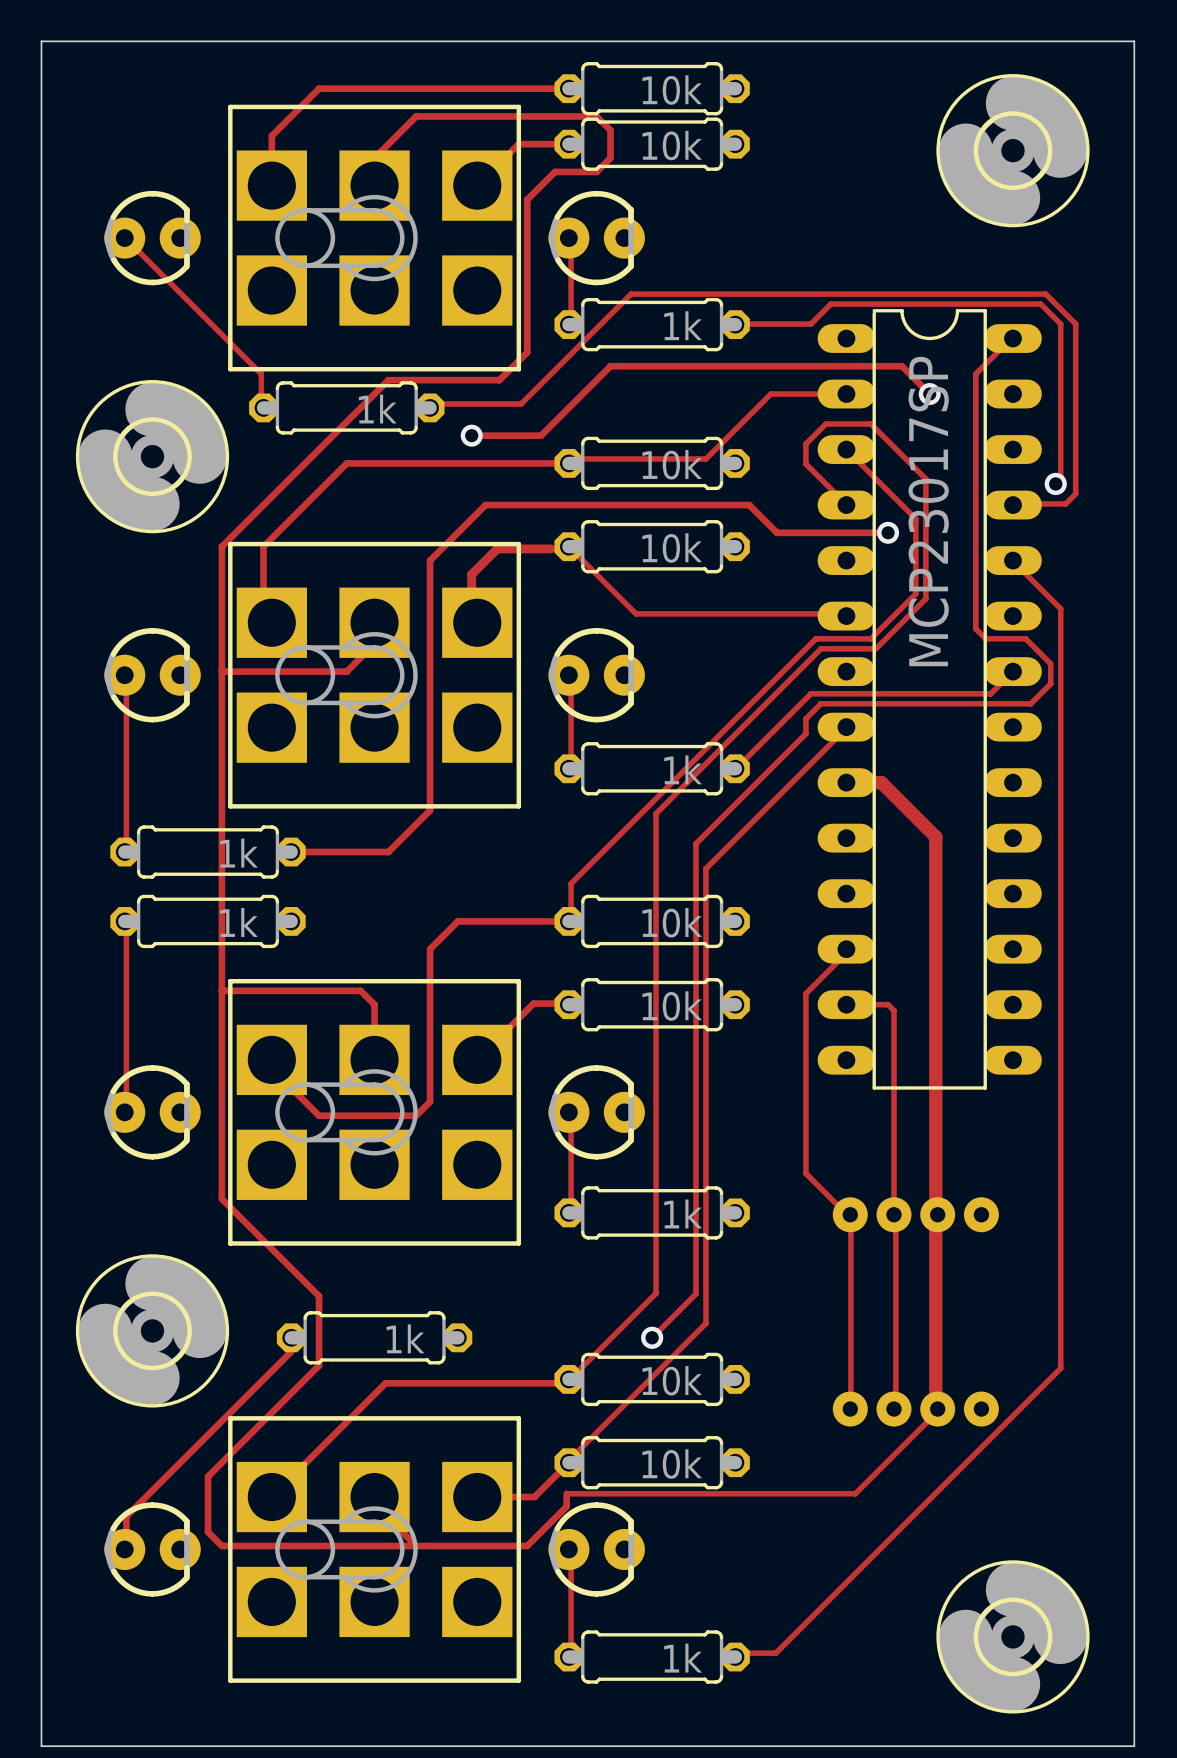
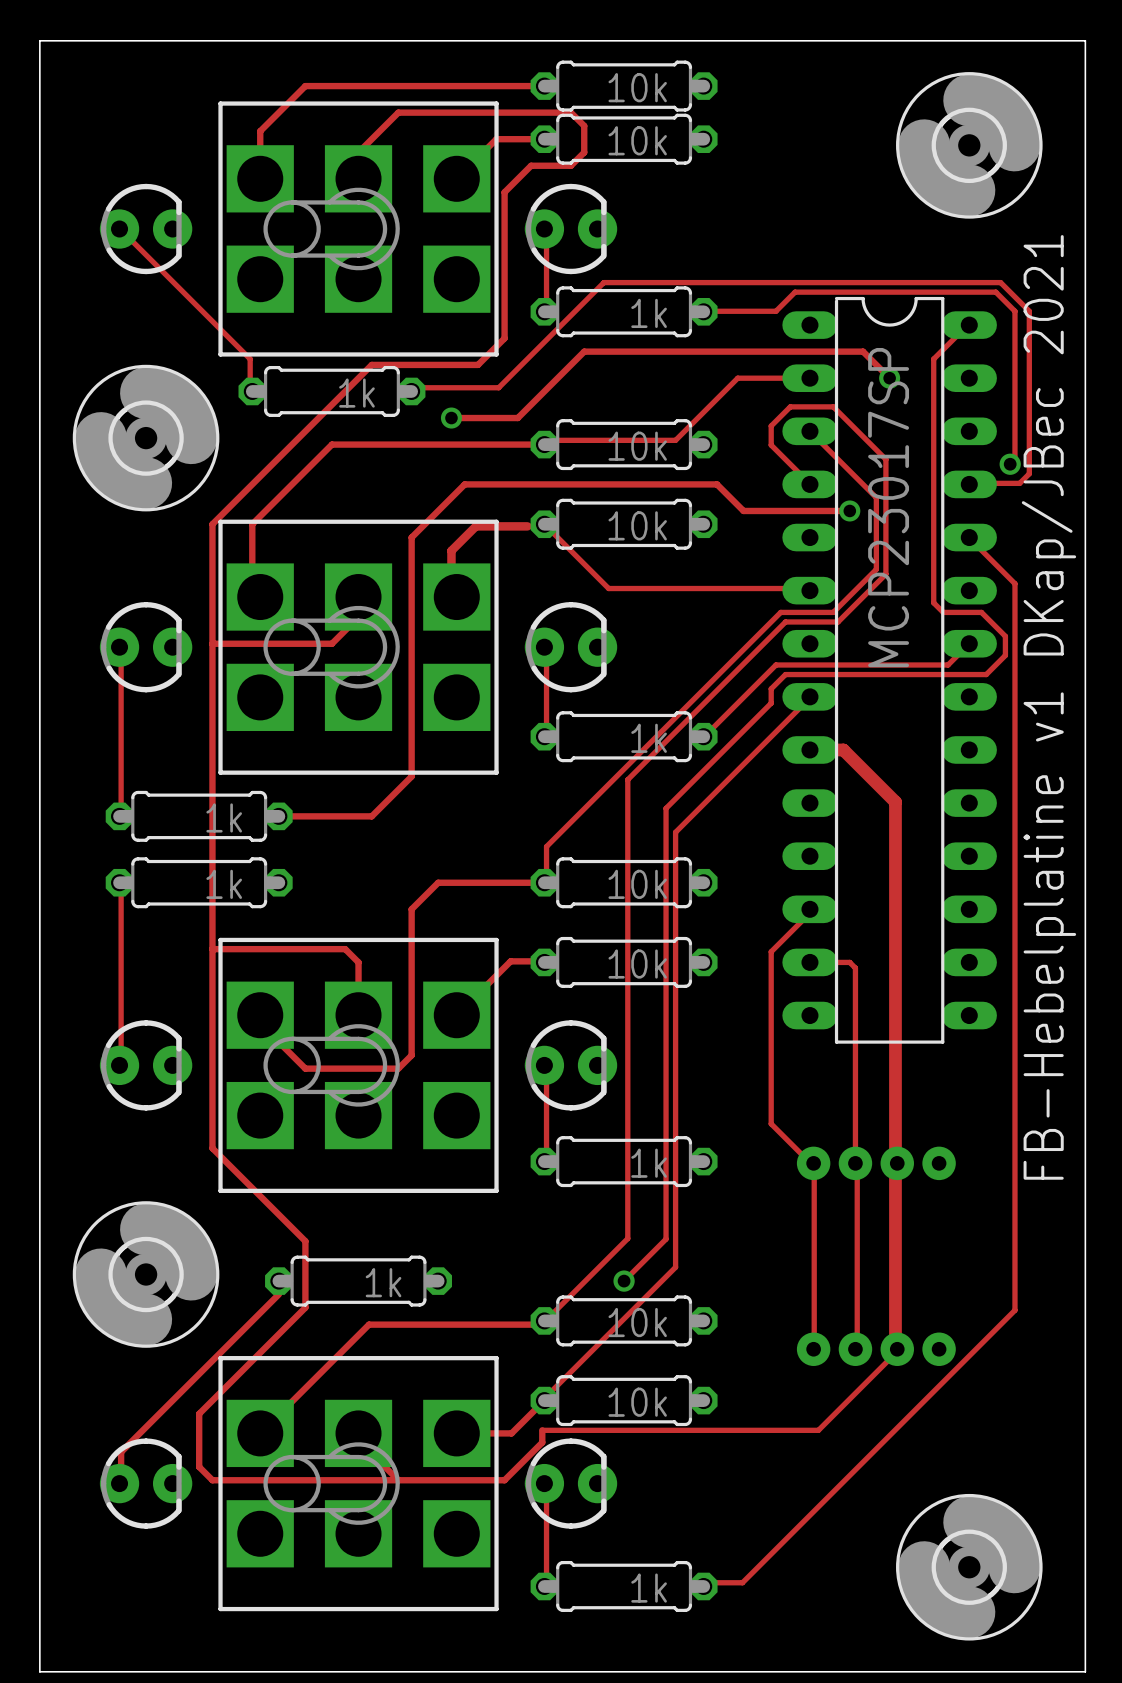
text: none -> FB-Hebelplatine v1 DKap/JBec 2021 (1048, 707)

